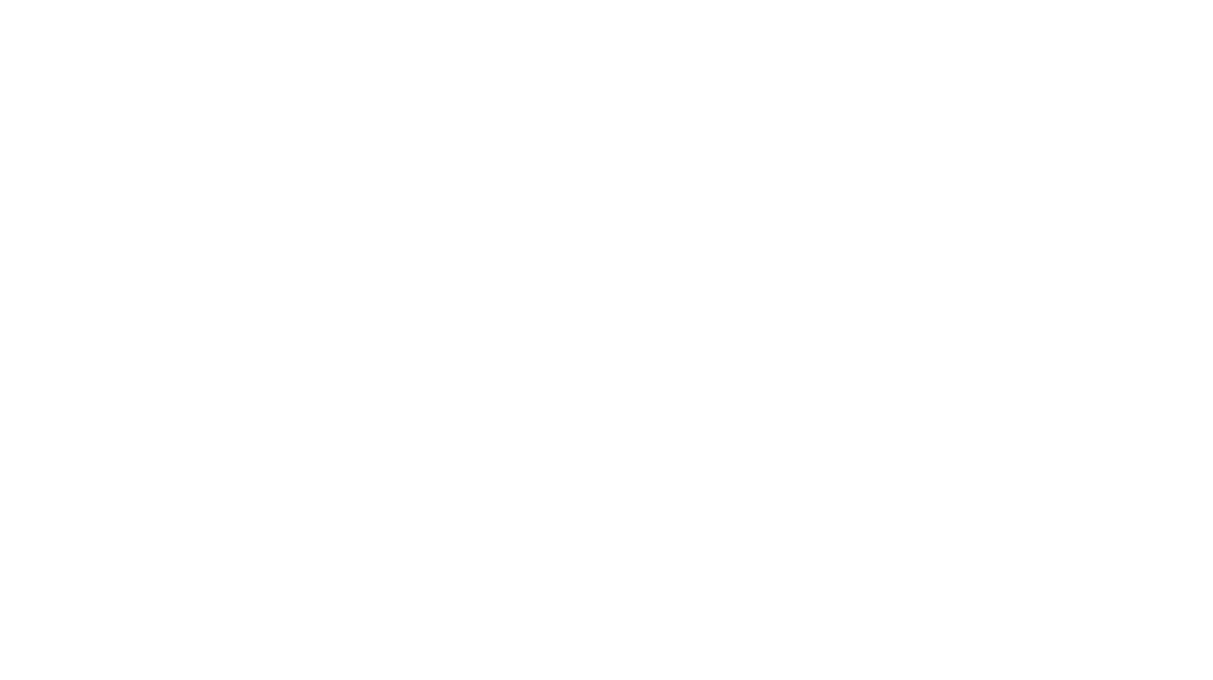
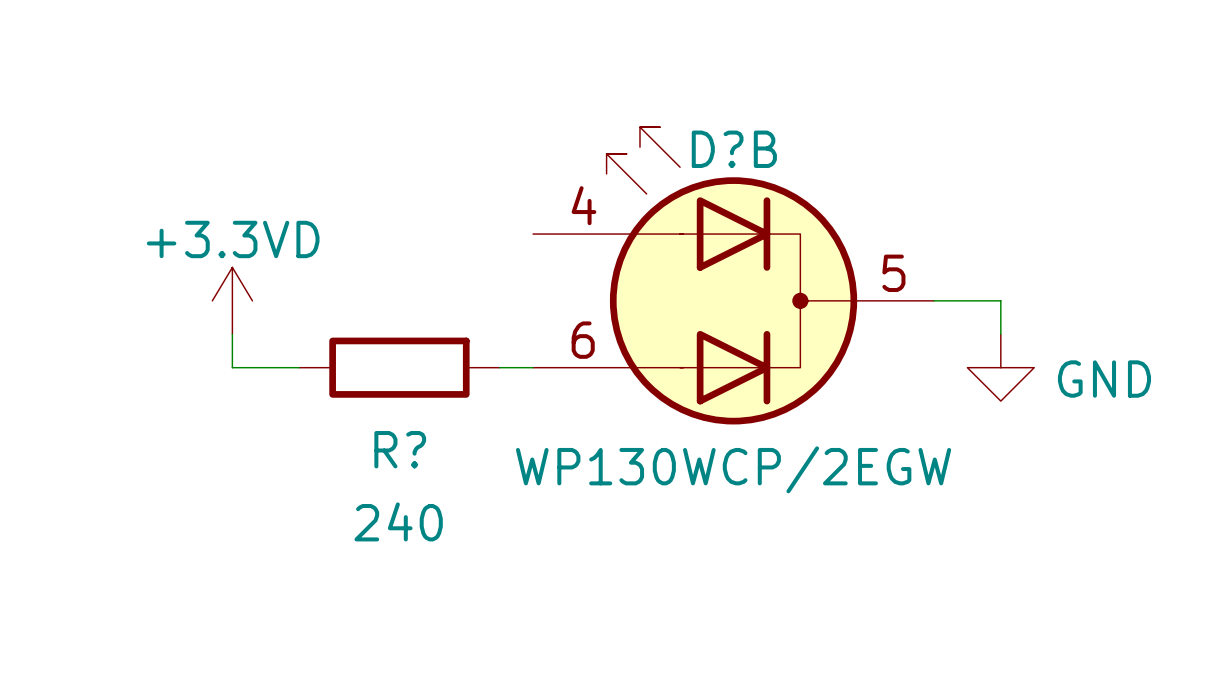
D?B: none -> WP130WCP/2EGW (733, 275)
power symbol: none -> +3.3VD (232, 300)
wire: none -> (934, 300) (1000, 300) (1000, 334)
wire: none -> (232, 334) (232, 367) (299, 367)
R?: none -> 240 (399, 367)
wire: none -> (499, 367) (533, 367)
power symbol: none -> GND (1000, 367)

